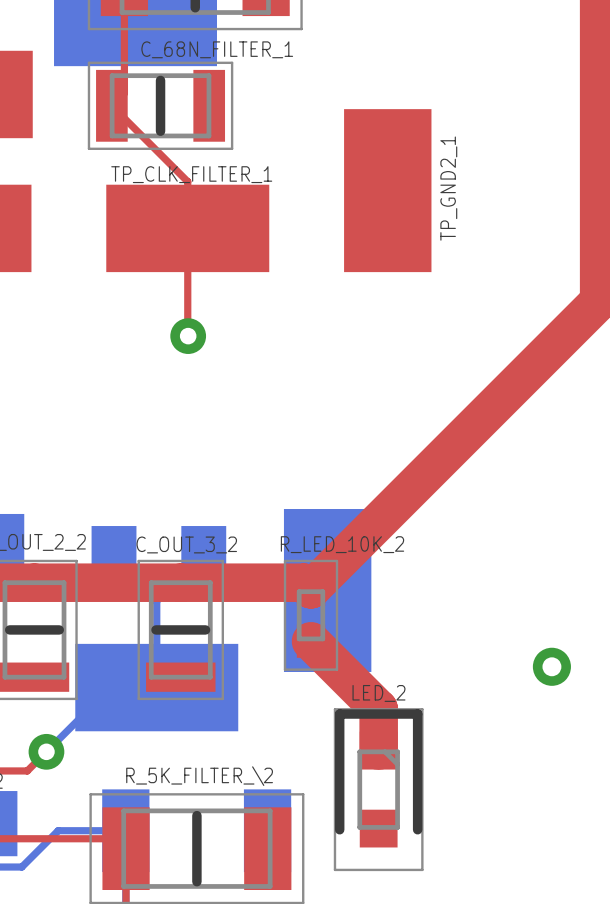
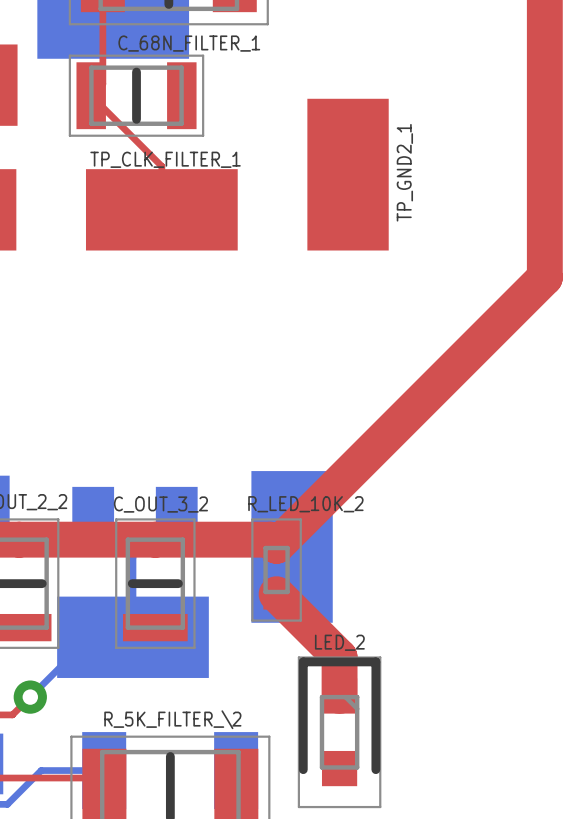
top track: (187, 228) (187, 335) -> none
via: (188, 336) -> none
via: (551, 666) -> none

